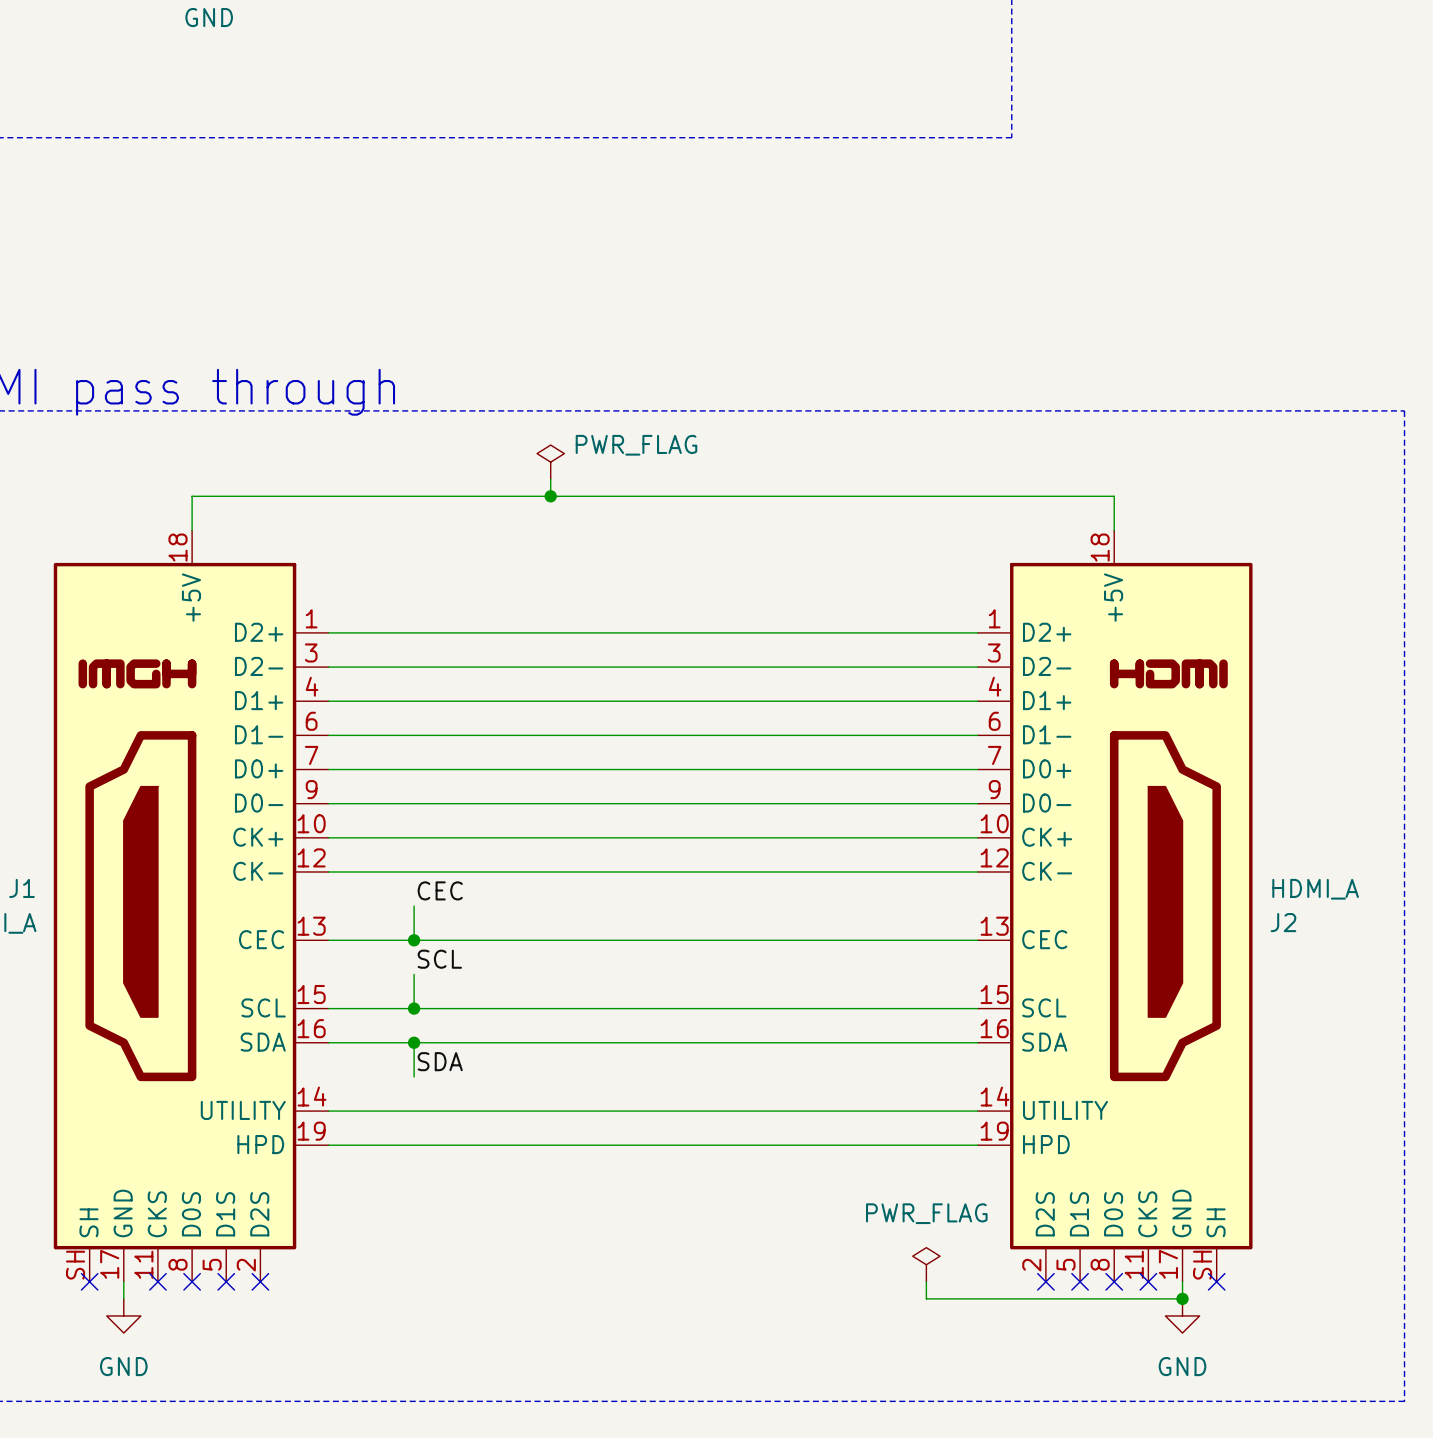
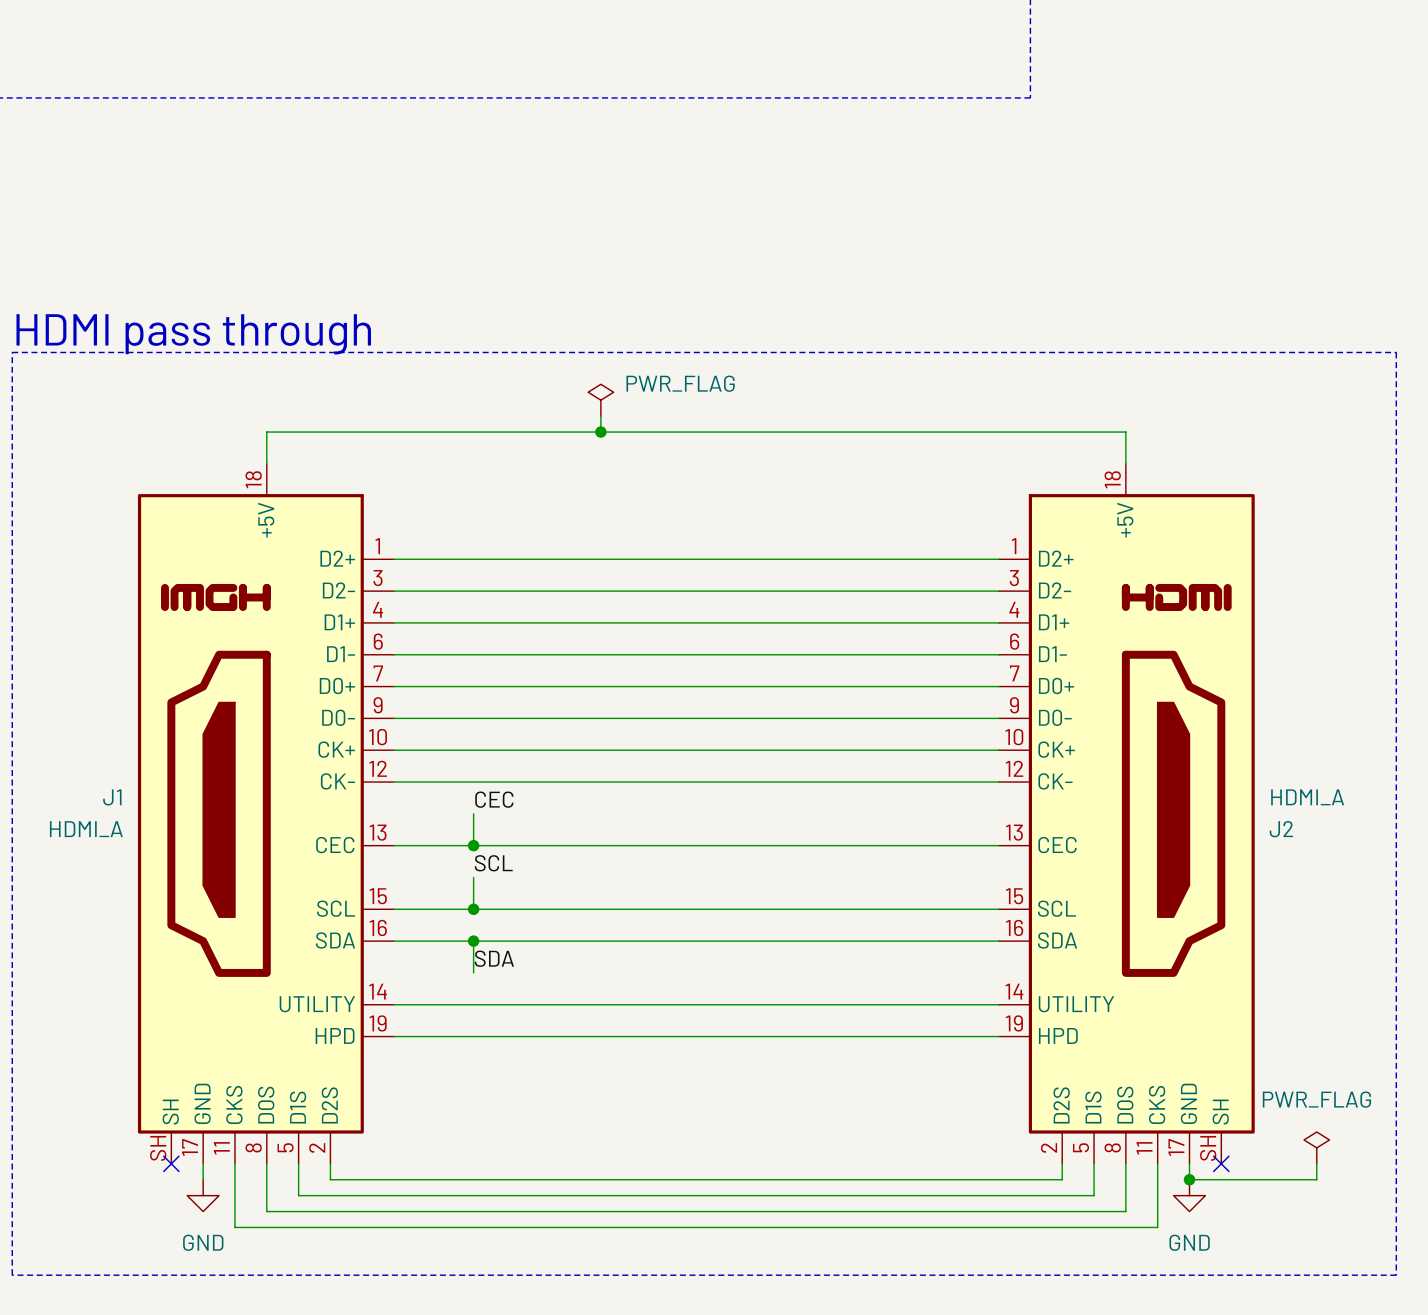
power symbol: PWR_FLAG (926, 1264) -> none
power symbol: none -> PWR_FLAG (1316, 1147)
wire: none -> (234, 1163) (234, 1227) (1157, 1227) (1157, 1163)
no-connect mark: (157, 1281) -> none
wire: none -> (266, 1163) (266, 1211) (1125, 1211) (1125, 1163)
no-connect mark: (192, 1281) -> none
wire: none -> (298, 1163) (298, 1195) (1094, 1195) (1094, 1163)
no-connect mark: (226, 1281) -> none
no-connect mark: (260, 1281) -> none
wire: (926, 1281) (926, 1298) -> (330, 1163) (330, 1179) (950, 1179)
no-connect mark: (1045, 1281) -> none
no-connect mark: (1080, 1281) -> none
no-connect mark: (1114, 1281) -> none
no-connect mark: (1148, 1281) -> none
wire: none -> (1316, 1163) (1316, 1179) (1189, 1179)
wire: (1045, 1298) (1182, 1298) -> (1062, 1179) (1062, 1163)

